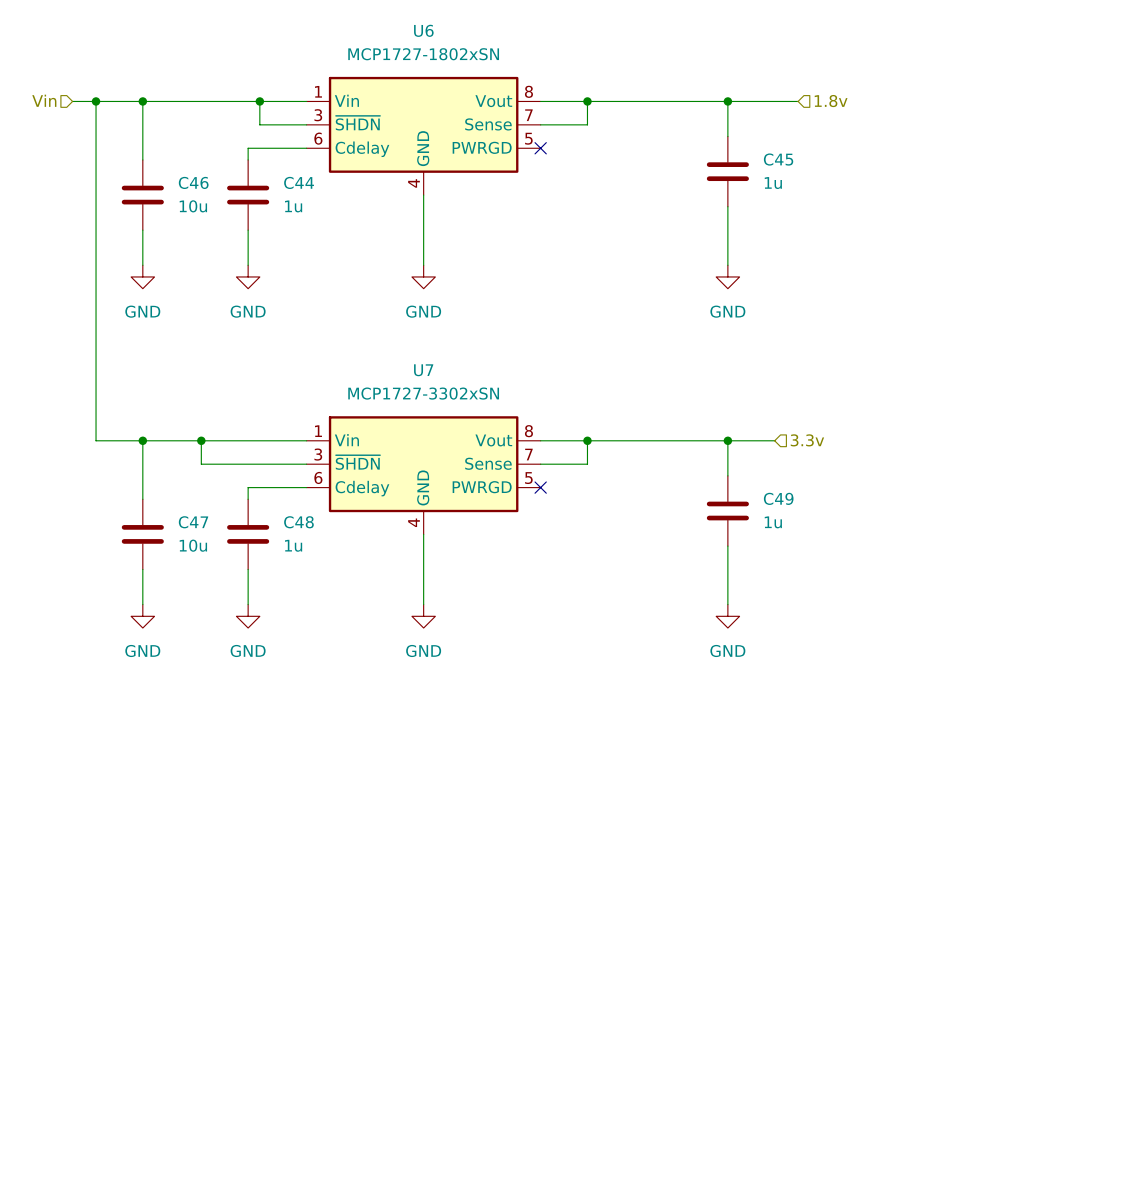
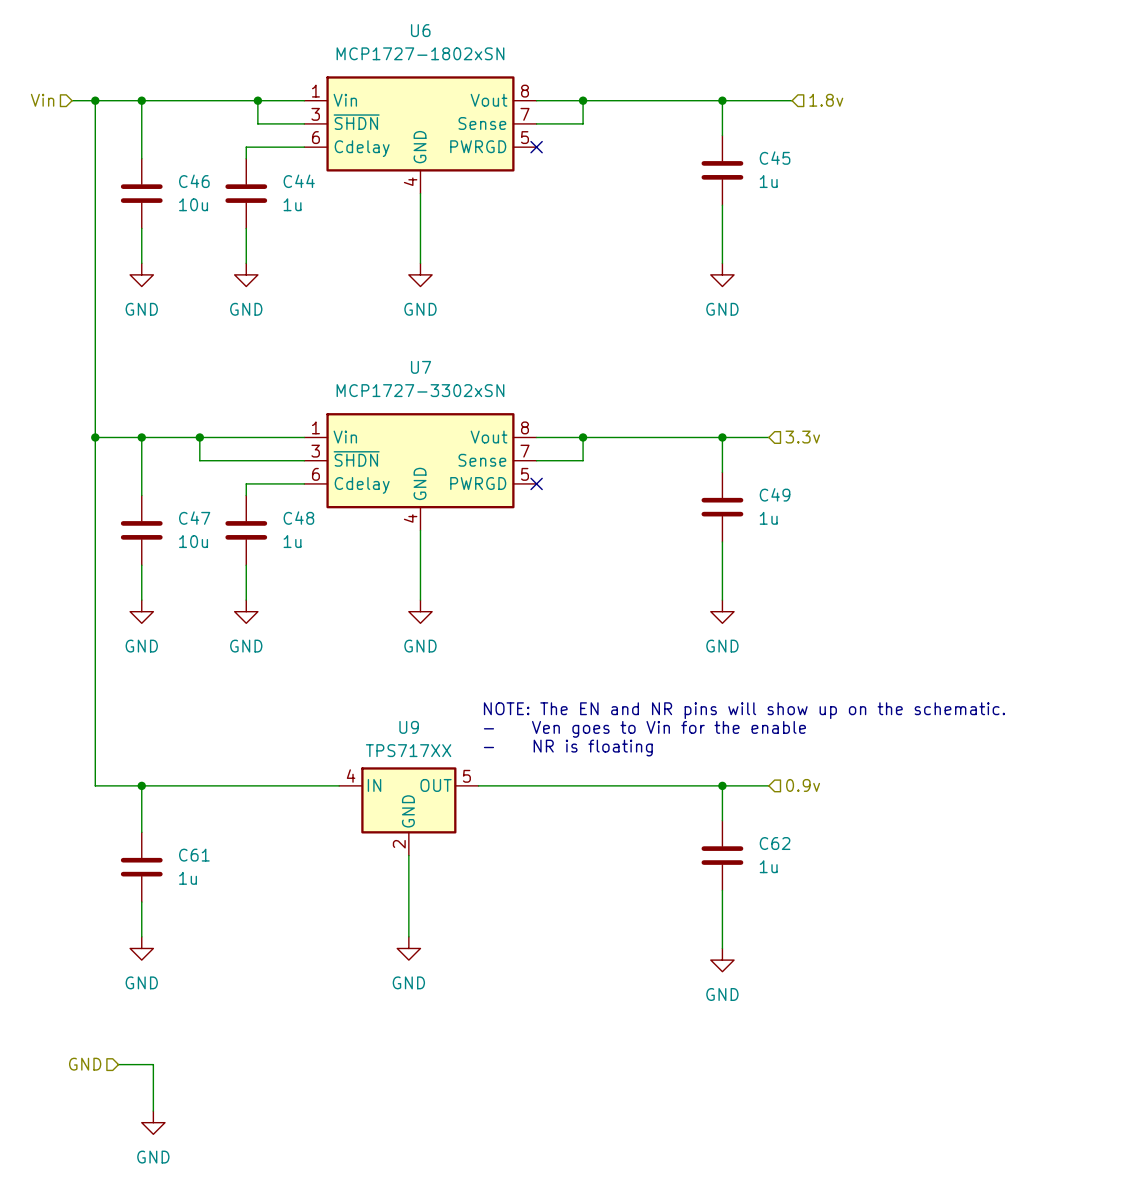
wire: none -> (95, 437) (95, 785) (339, 785)
junction: none -> (95, 437)
text: none -> NOTE: The EN and NR pins will show up on the schematic. (744, 710)
text: none -> - Ven goes to Vin for the enable (644, 729)
text: none -> - NR is floating (568, 748)
wire: none -> (141, 785) (141, 832)
junction: none -> (141, 785)
wire: none -> (478, 785) (768, 785)
wire: none -> (722, 785) (722, 820)
junction: none -> (722, 785)
hierarchical label: none -> 0.9v (803, 785)
U9: none -> TPS717XX (408, 811)
wire: none -> (408, 855) (408, 936)
C62: none -> 1u (722, 855)
C61: none -> 1u (141, 867)
wire: none -> (722, 890) (722, 948)
wire: none -> (141, 902) (141, 936)
power symbol: none -> GND (141, 948)
power symbol: none -> GND (408, 948)
power symbol: none -> GND (722, 960)
hierarchical label: none -> GND (85, 1064)
wire: none -> (118, 1064) (153, 1064) (153, 1111)
power symbol: none -> GND (153, 1122)

